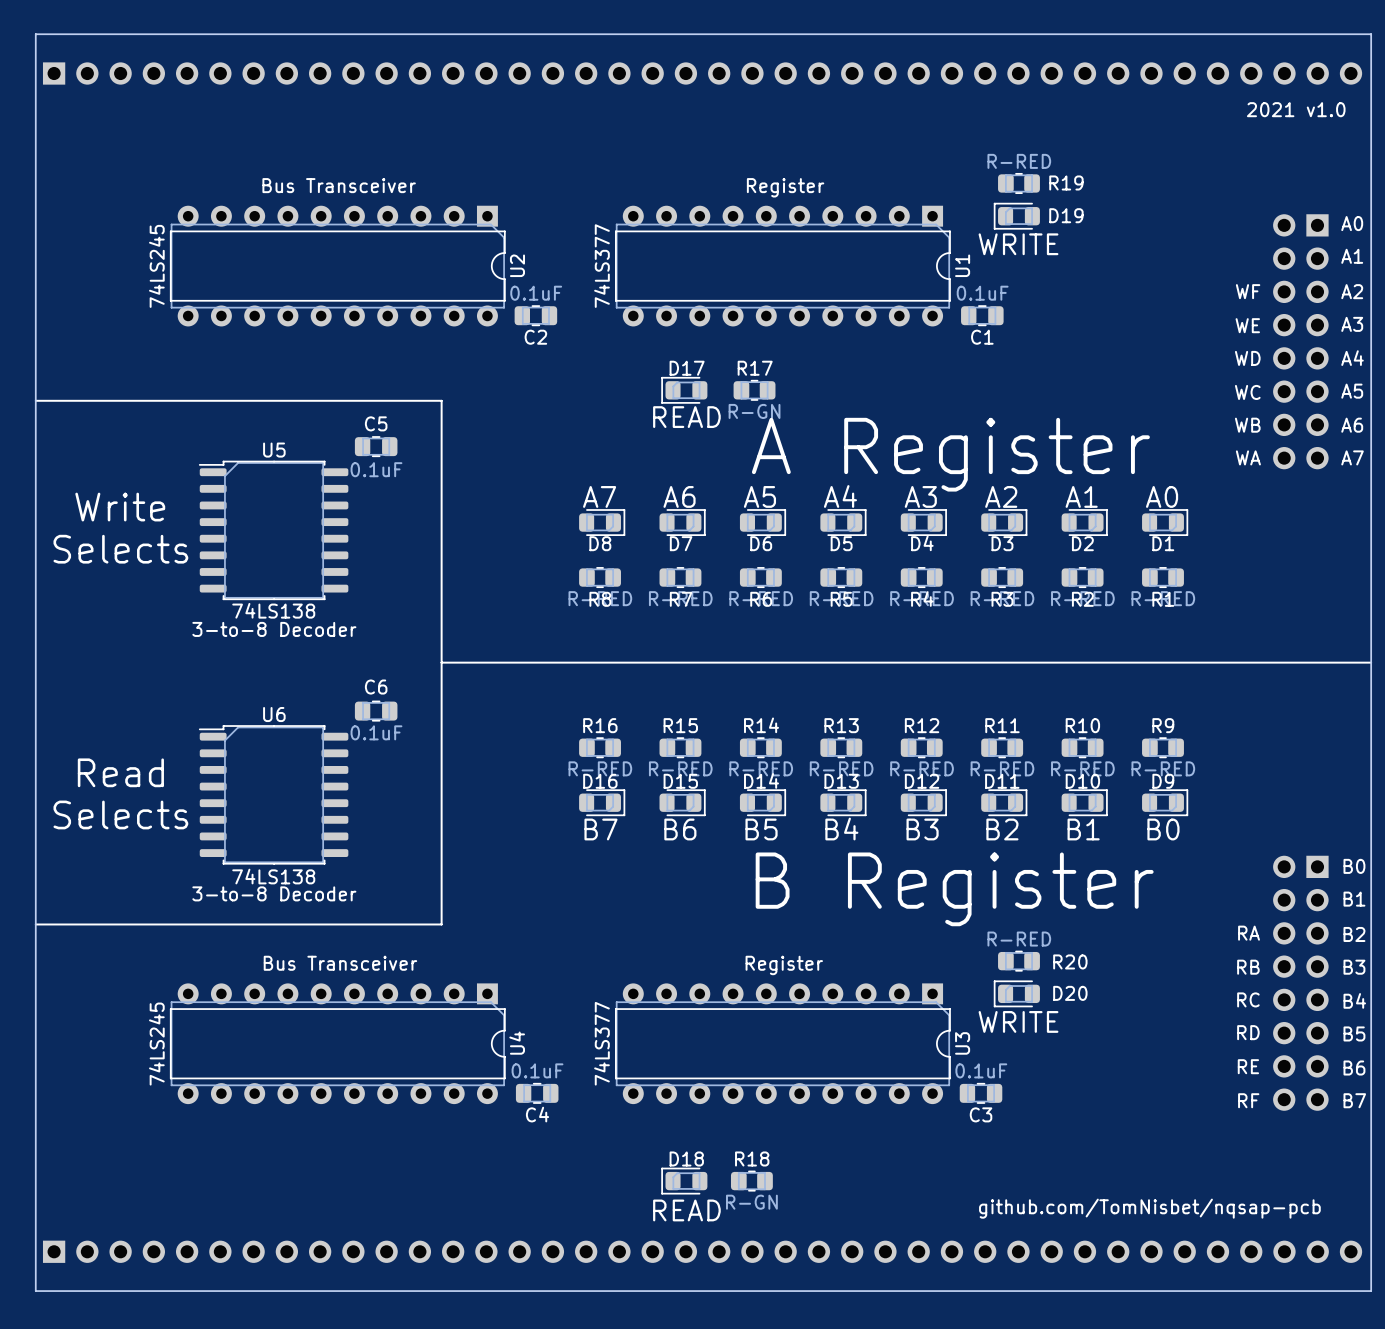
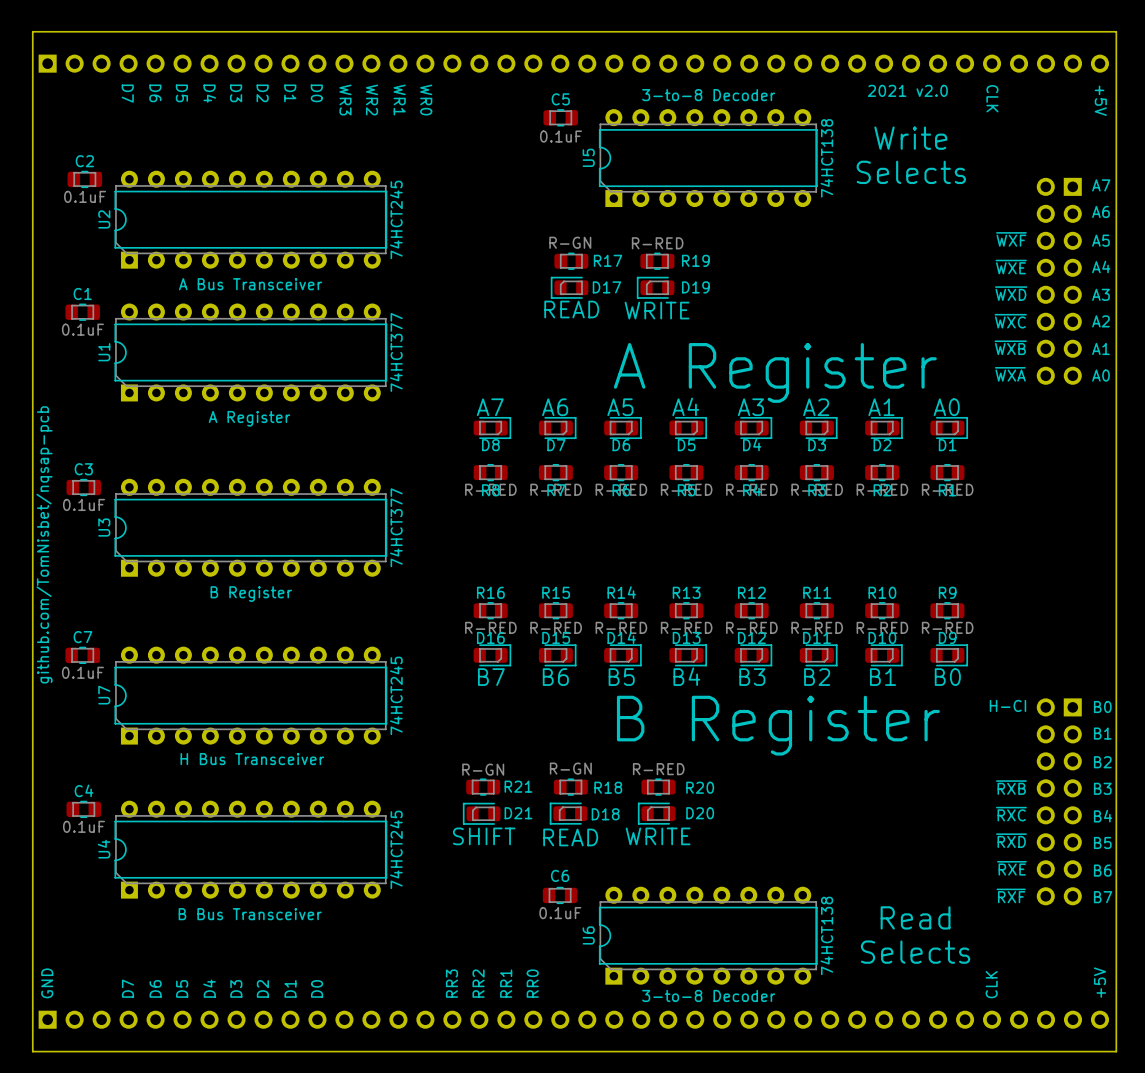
text: none -> 2021 v2.0 (907, 90)
text: 2021 v1.0 (1296, 109) -> none
text: none -> D7 (127, 93)
text: none -> D6 (155, 93)
text: none -> D5 (181, 93)
text: none -> D4 (209, 93)
text: none -> D3 (236, 93)
text: none -> D2 (262, 93)
text: none -> D1 (290, 93)
text: none -> D0 (316, 93)
text: none -> CLK (992, 98)
text: none -> WR3 (345, 99)
text: none -> WR2 (372, 99)
text: none -> WR1 (399, 99)
text: none -> WR0 (426, 99)
text: none -> +5V (1100, 100)
text: none -> Write (910, 138)
R19 position: (1018, 183) -> (657, 261)
U2 footprint: [169, 205, 506, 327] -> [114, 170, 388, 269]
U1 footprint: [615, 205, 951, 327] -> [114, 303, 388, 402]
text: none -> Selects (911, 172)
D19 position: (1016, 216) -> (655, 287)
text: A0 (1352, 223) -> A7 (1101, 185)
text: A1 (1352, 256) -> A6 (1100, 211)
U2 name position: U2 (517, 265) -> U2 (104, 219)
U1 name position: U1 (962, 265) -> U1 (104, 352)
U2 value: 74LS245 (156, 266) -> 74HCT245 (396, 219)
U1 value: 74LS377 (601, 266) -> 74HCT377 (396, 352)
text: none -> ~{WXF} (1011, 239)
text: WF (1248, 291) -> none
text: A2 (1352, 291) -> A5 (1100, 240)
C2 value position: 0.1uF (536, 293) -> 0.1uF (85, 196)
C1 value position: 0.1uF (982, 293) -> 0.1uF (82, 329)
C2 position: (535, 315) -> (84, 179)
C1 position: (982, 315) -> (82, 312)
text: none -> ~{WXE} (1011, 267)
text: A3 (1352, 324) -> A4 (1101, 266)
text: WE (1247, 325) -> none
C2 name position: C2 (535, 337) -> C2 (84, 161)
C1 name position: C1 (982, 337) -> C1 (82, 293)
text: WD (1247, 358) -> ~{WXD} (1011, 293)
text: A4 (1352, 358) -> A3 (1100, 294)
D17 name position: D17 (687, 368) -> D17 (606, 287)
R17 name position: R17 (755, 368) -> R17 (607, 260)
D17 position: (684, 390) -> (569, 287)
R17 position: (754, 390) -> (571, 261)
text: none -> ~{WXC} (1010, 321)
text: A5 (1352, 391) -> A2 (1100, 321)
text: WC (1247, 392) -> none
line: (35, 400) (441, 400) (441, 924) (35, 924) -> none
R17 value position: R-GN (754, 411) -> R-GN (570, 242)
text: none -> ~{WXB} (1010, 347)
text: WB (1247, 425) -> none
text: A6 (1352, 425) -> A1 (1100, 349)
C5 position: (376, 446) -> (560, 117)
U5 name position: U5 (274, 450) -> U5 (588, 157)
text: WA (1248, 457) -> ~{WXA} (1010, 374)
text: A7 (1352, 457) -> A0 (1100, 375)
U5 footprint: [198, 460, 349, 601] -> [599, 109, 818, 208]
text: Write (120, 507) -> none
text: Selects (120, 549) -> none
U5 value: 74LS138 (273, 610) -> 74HCT138 (826, 158)
line: (441, 662) (1371, 662) -> none
text: none -> github.com/TomNisbet/nqsap-pcb (44, 544)
C6 position: (376, 711) -> (560, 895)
U6 name position: U6 (274, 714) -> U6 (588, 935)
U6 footprint: [198, 725, 349, 865] -> [599, 886, 818, 985]
text: Read (120, 772) -> none
C7: none -> 0.1uF (82, 655)
text: Selects (120, 814) -> none
U7: none -> 74HCT245 (250, 695)
text: none -> H-CI (1007, 705)
U6 value: 74LS138 (273, 876) -> 74HCT138 (826, 935)
text: RA (1249, 933) -> none
R20 position: (1018, 961) -> (658, 787)
R21: none -> R-GN (483, 787)
text: none -> ~{RXB} (1011, 787)
text: RB (1248, 967) -> none
U4 footprint: [169, 983, 506, 1105] -> [114, 800, 388, 899]
U3 footprint: [615, 983, 951, 1105] -> [114, 478, 388, 577]
D20 position: (1016, 993) -> (656, 813)
D21: none -> SHIFT (481, 813)
text: none -> ~{RXC} (1011, 814)
text: RC (1248, 999) -> none
text: none -> ~{RXD} (1011, 840)
text: RD (1248, 1032) -> none
U4 name position: U4 (517, 1043) -> U4 (104, 849)
U3 value: 74LS377 (601, 1043) -> 74HCT377 (396, 527)
U3 name position: U3 (962, 1043) -> U3 (104, 527)
U4 value: 74LS245 (156, 1044) -> 74HCT245 (396, 849)
text: none -> ~{RXE} (1011, 868)
text: RE (1248, 1066) -> none
C4 value position: 0.1uF (537, 1070) -> 0.1uF (84, 826)
C3 value position: 0.1uF (981, 1070) -> 0.1uF (84, 504)
C4 position: (537, 1093) -> (83, 809)
C3 position: (981, 1093) -> (83, 487)
text: RF (1248, 1100) -> ~{RXF} (1011, 895)
C4 name position: C4 (537, 1114) -> C4 (84, 790)
C3 name position: C3 (981, 1114) -> C3 (83, 469)
text: none -> Read (915, 917)
D18 name position: D18 (686, 1158) -> D18 (605, 814)
R18 name position: R18 (752, 1158) -> R18 (608, 787)
text: none -> Selects (915, 952)
D18 position: (684, 1181) -> (568, 813)
R18 position: (751, 1181) -> (570, 787)
R18 value position: R-GN (751, 1202) -> R-GN (570, 768)
text: none -> GND (47, 983)
text: none -> +5V (1100, 982)
text: none -> RR3 (451, 983)
text: none -> RR2 (478, 983)
text: none -> RR1 (506, 983)
text: none -> RR0 (532, 983)
text: github.com/TomNisbet/nqsap-pcb (1149, 1208) -> none
text: none -> CLK (991, 984)
text: none -> D7 (127, 988)
text: none -> D6 (155, 988)
text: none -> D5 (182, 988)
text: none -> D4 (209, 988)
text: none -> D3 (236, 988)
text: none -> D2 (262, 988)
text: none -> D1 (290, 988)
text: none -> D0 (317, 988)

